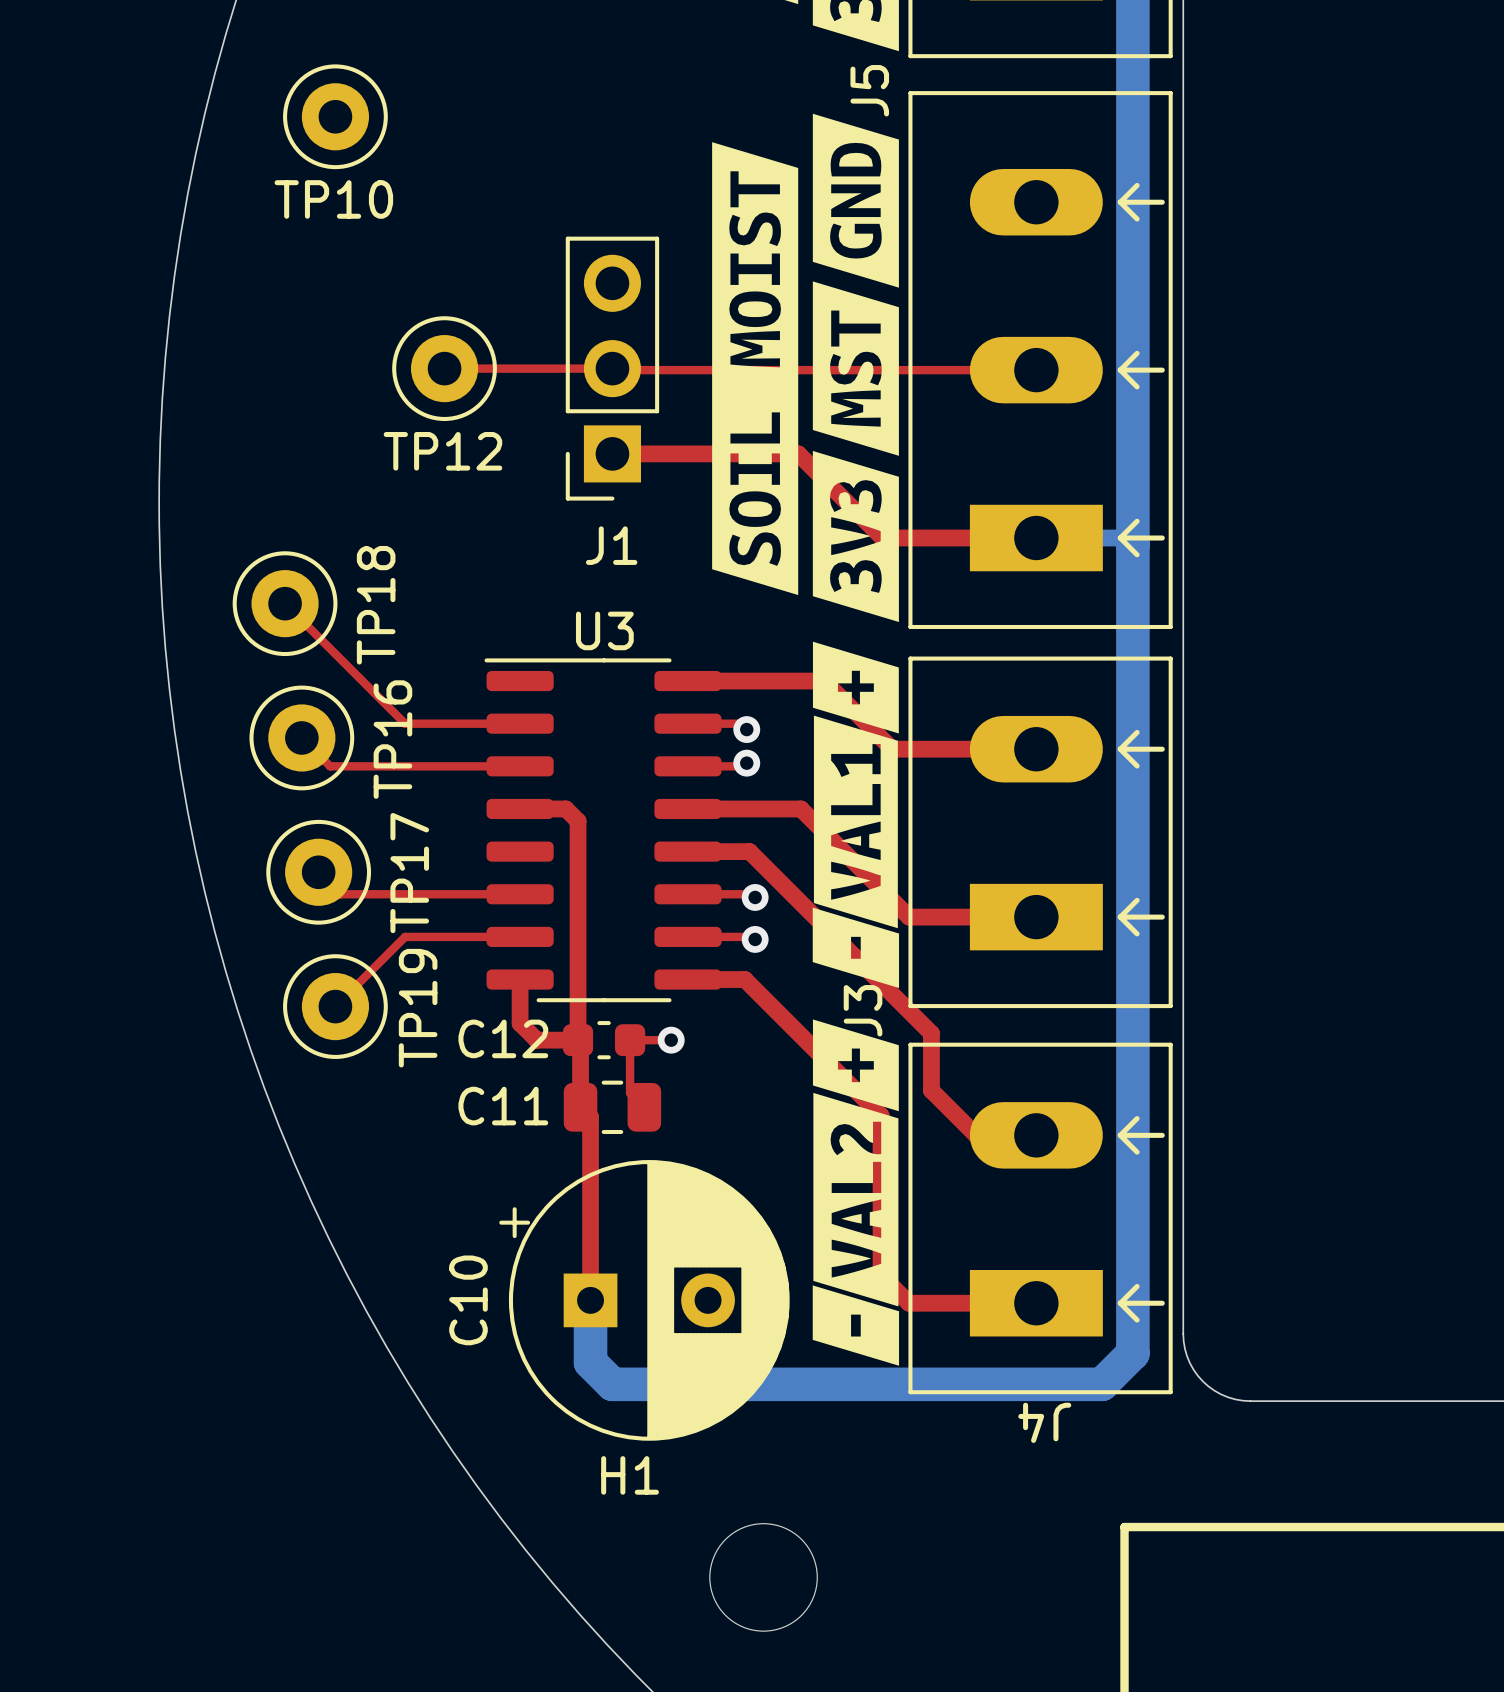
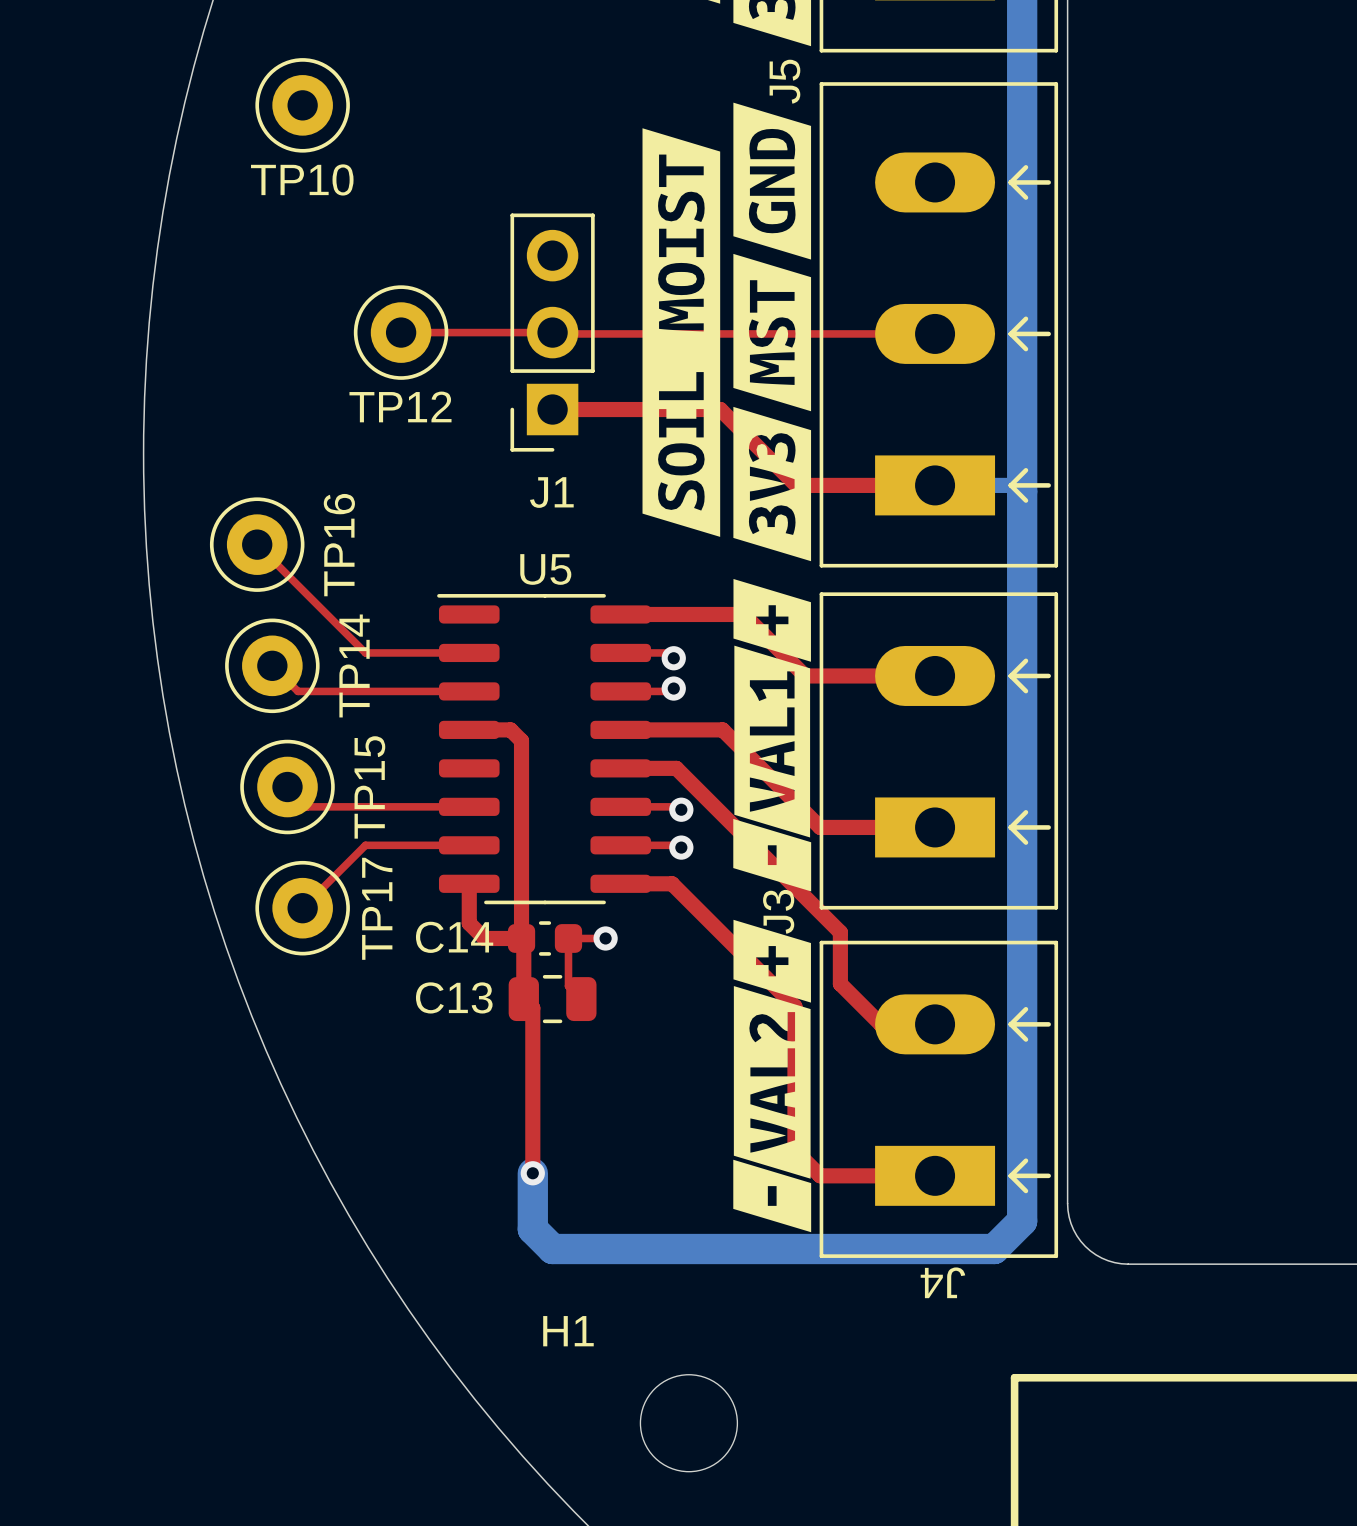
TP18 name: TP18 (376, 605) -> TP16 (339, 545)
U3 name: U3 (604, 630) -> U5 (545, 569)
TP16 name: TP16 (392, 739) -> TP14 (354, 665)
TP17 name: TP17 (409, 873) -> TP15 (369, 787)
TP19 name: TP19 (418, 1008) -> TP17 (377, 908)
C12 name: C12 (503, 1038) -> C14 (454, 937)
C11 name: C11 (503, 1106) -> C13 (454, 997)
via: none -> (532, 1173)
C10: (644, 1300) -> none

